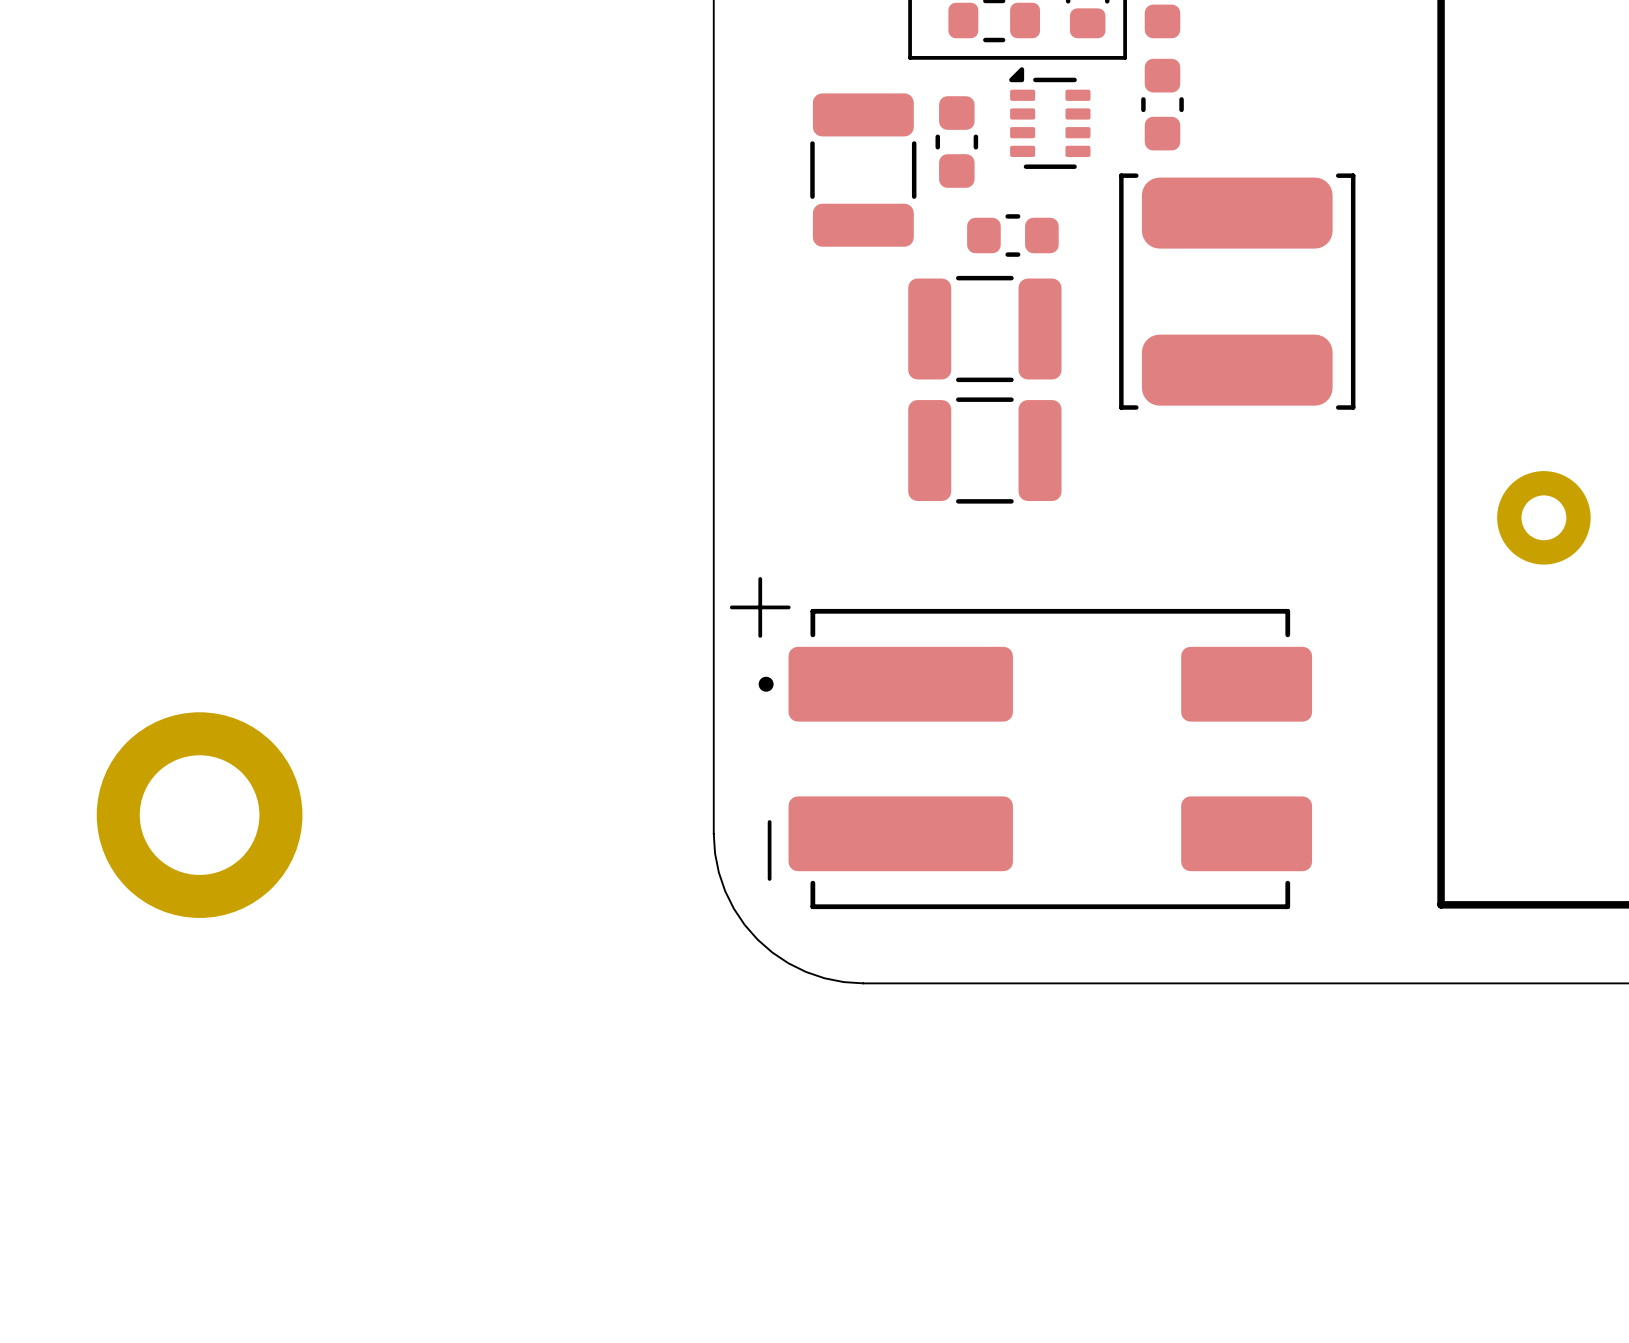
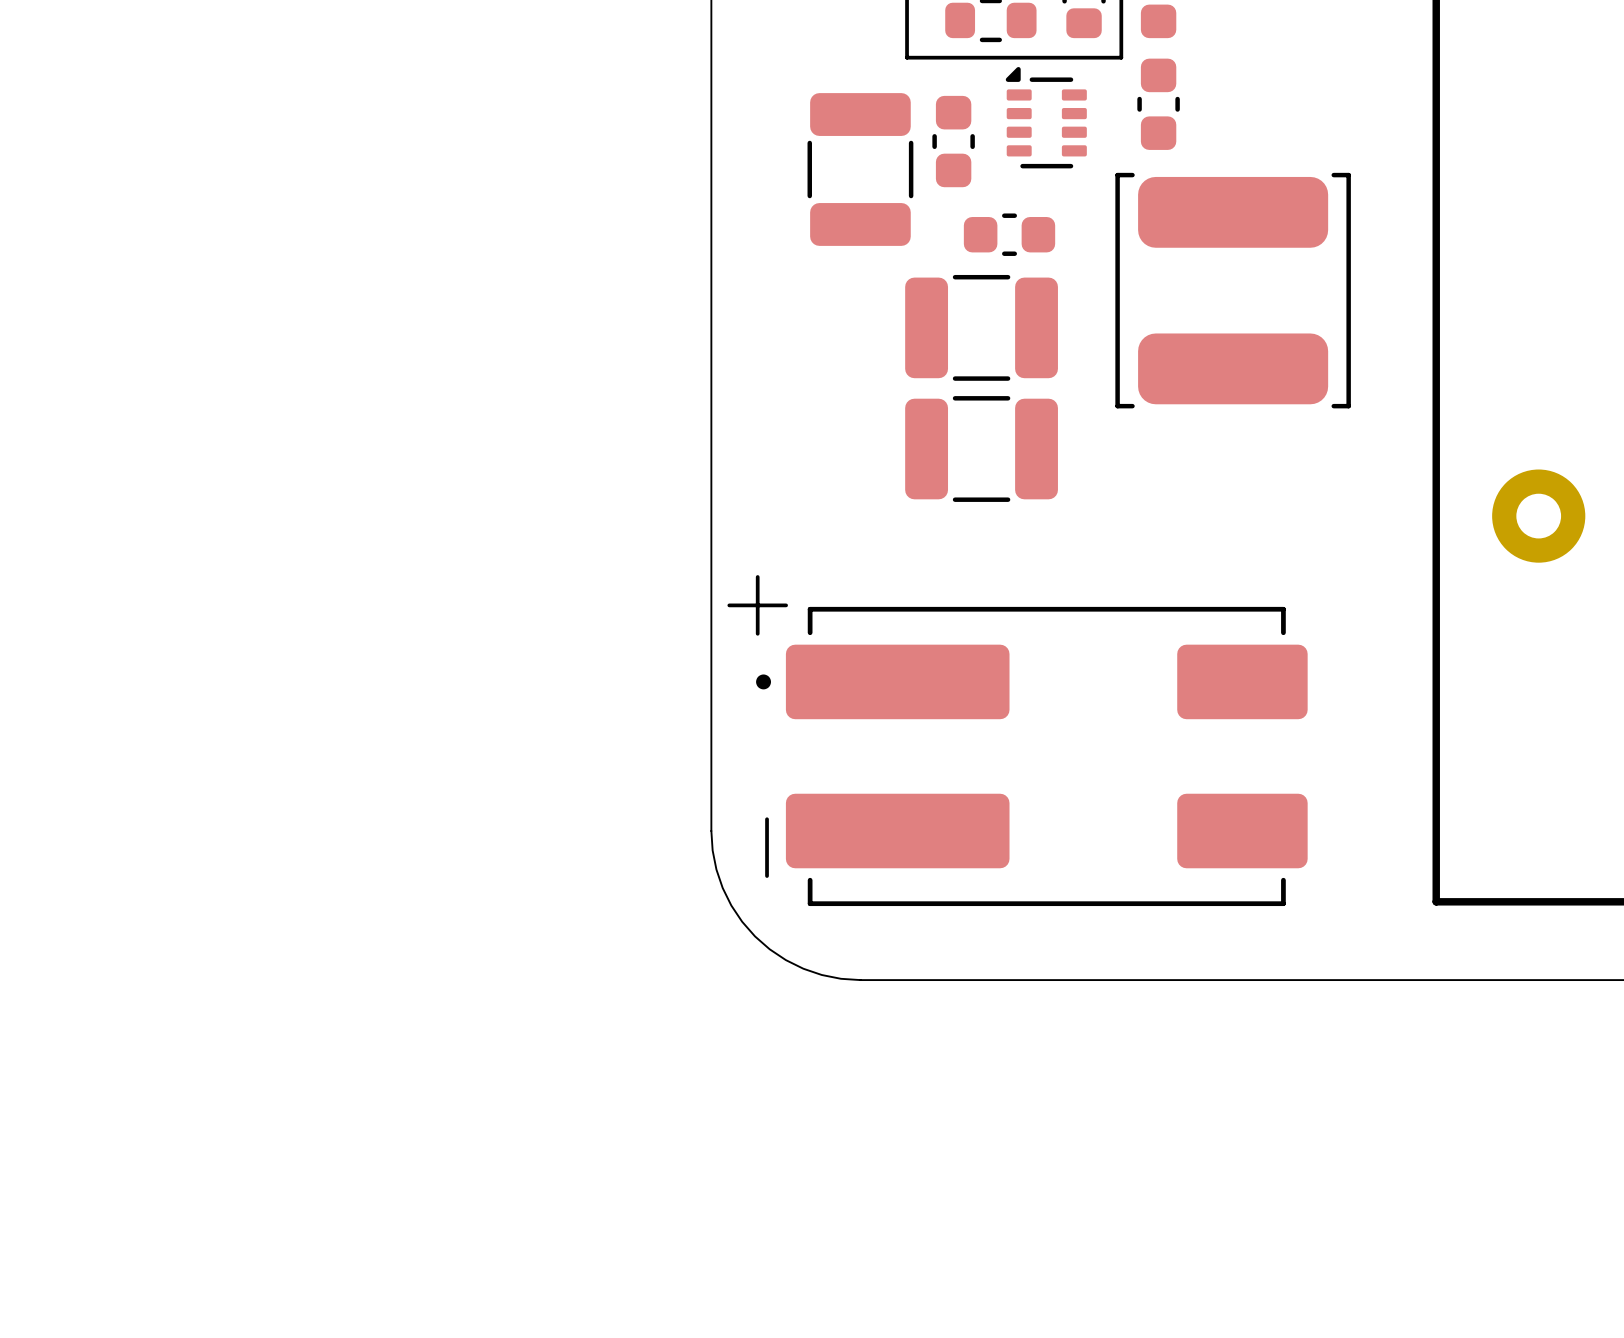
part: (199, 815) -> none

